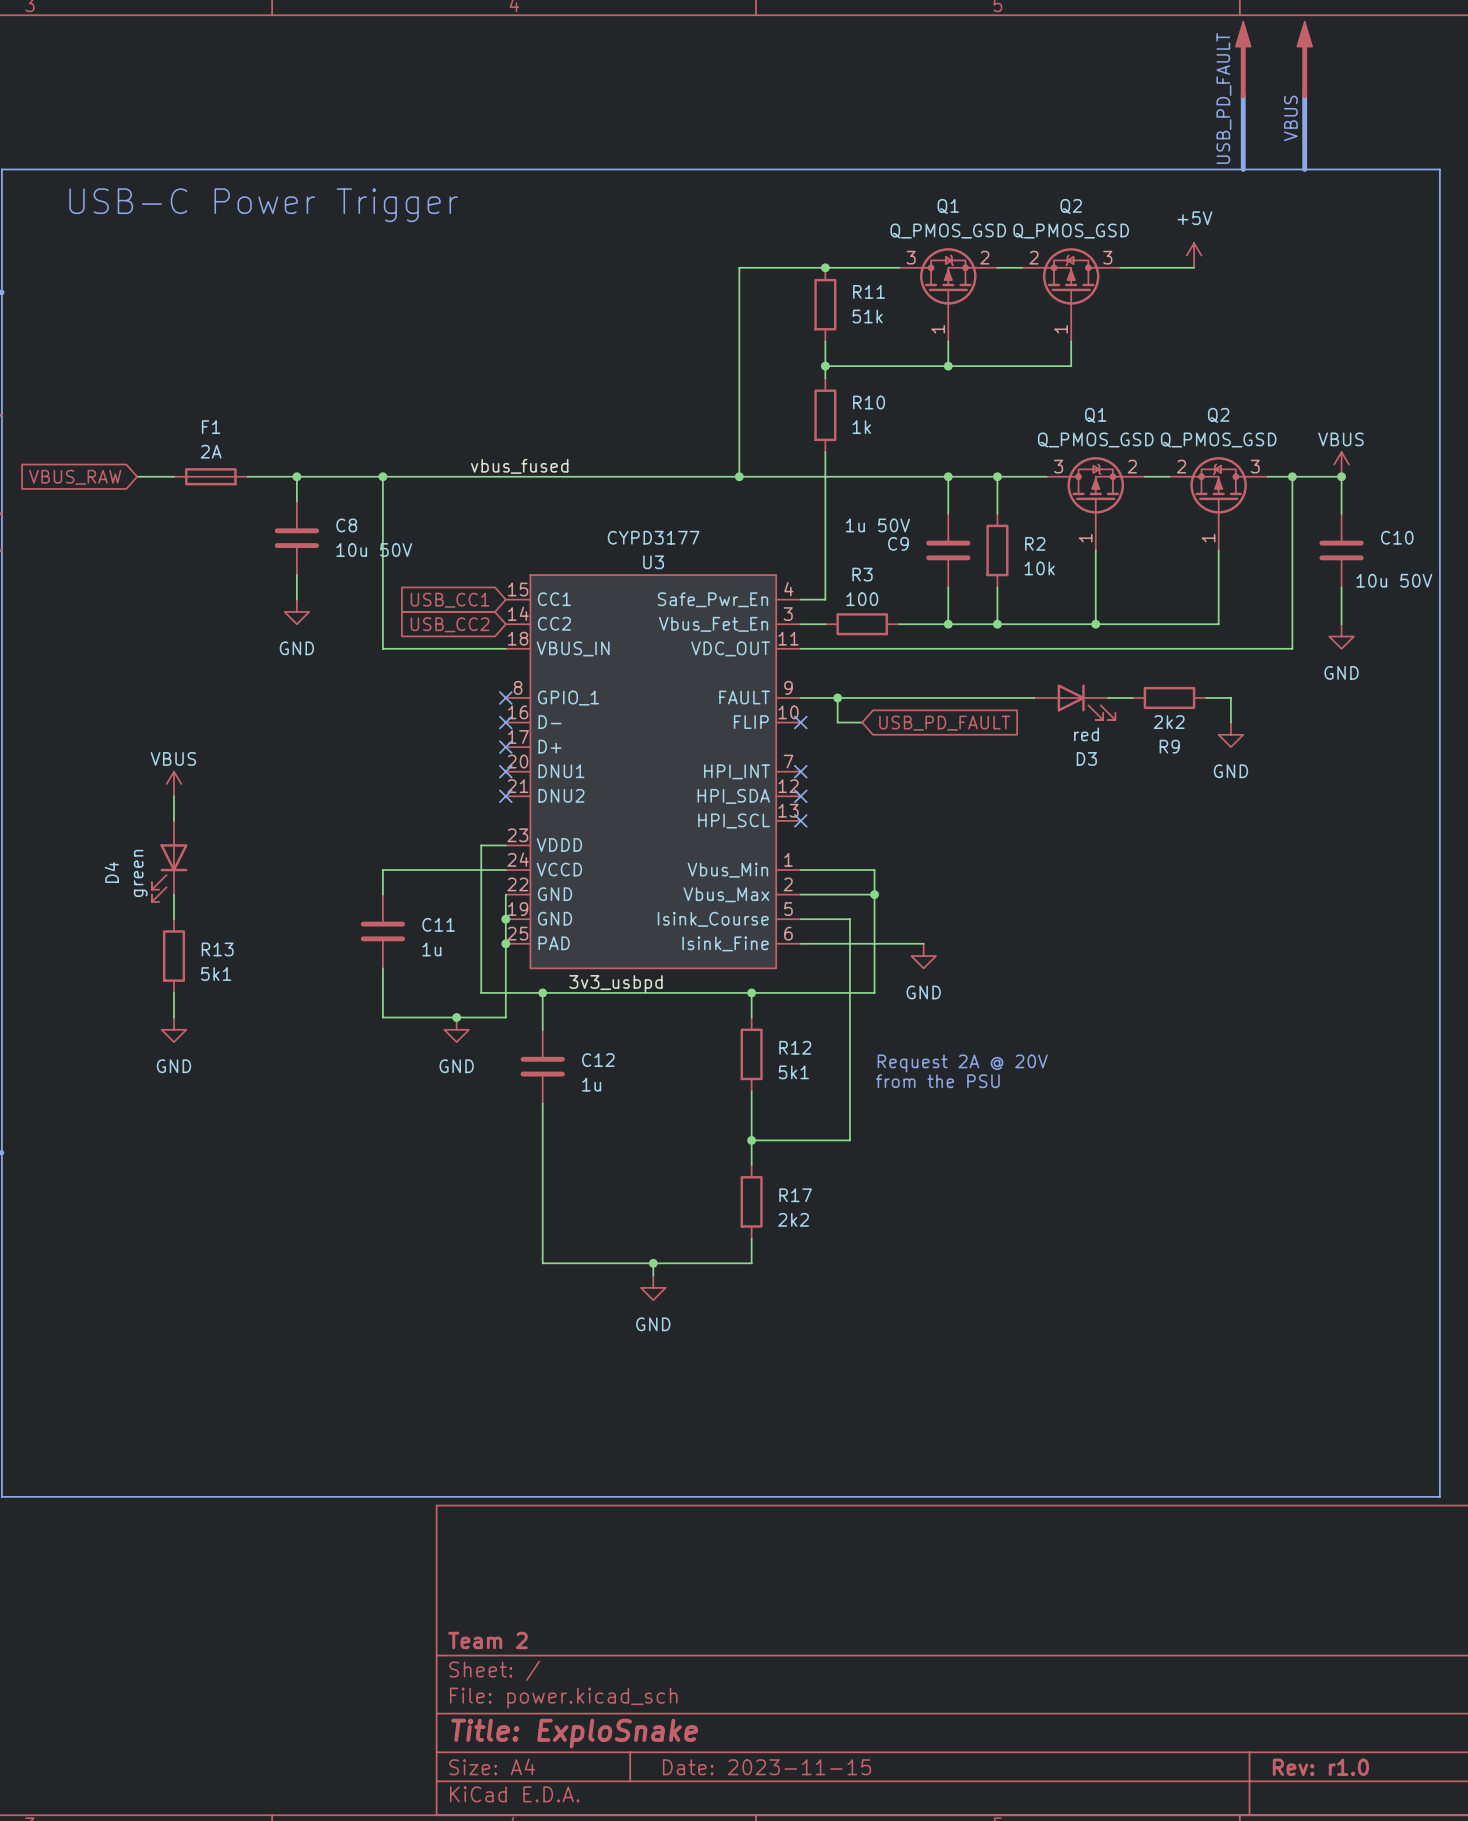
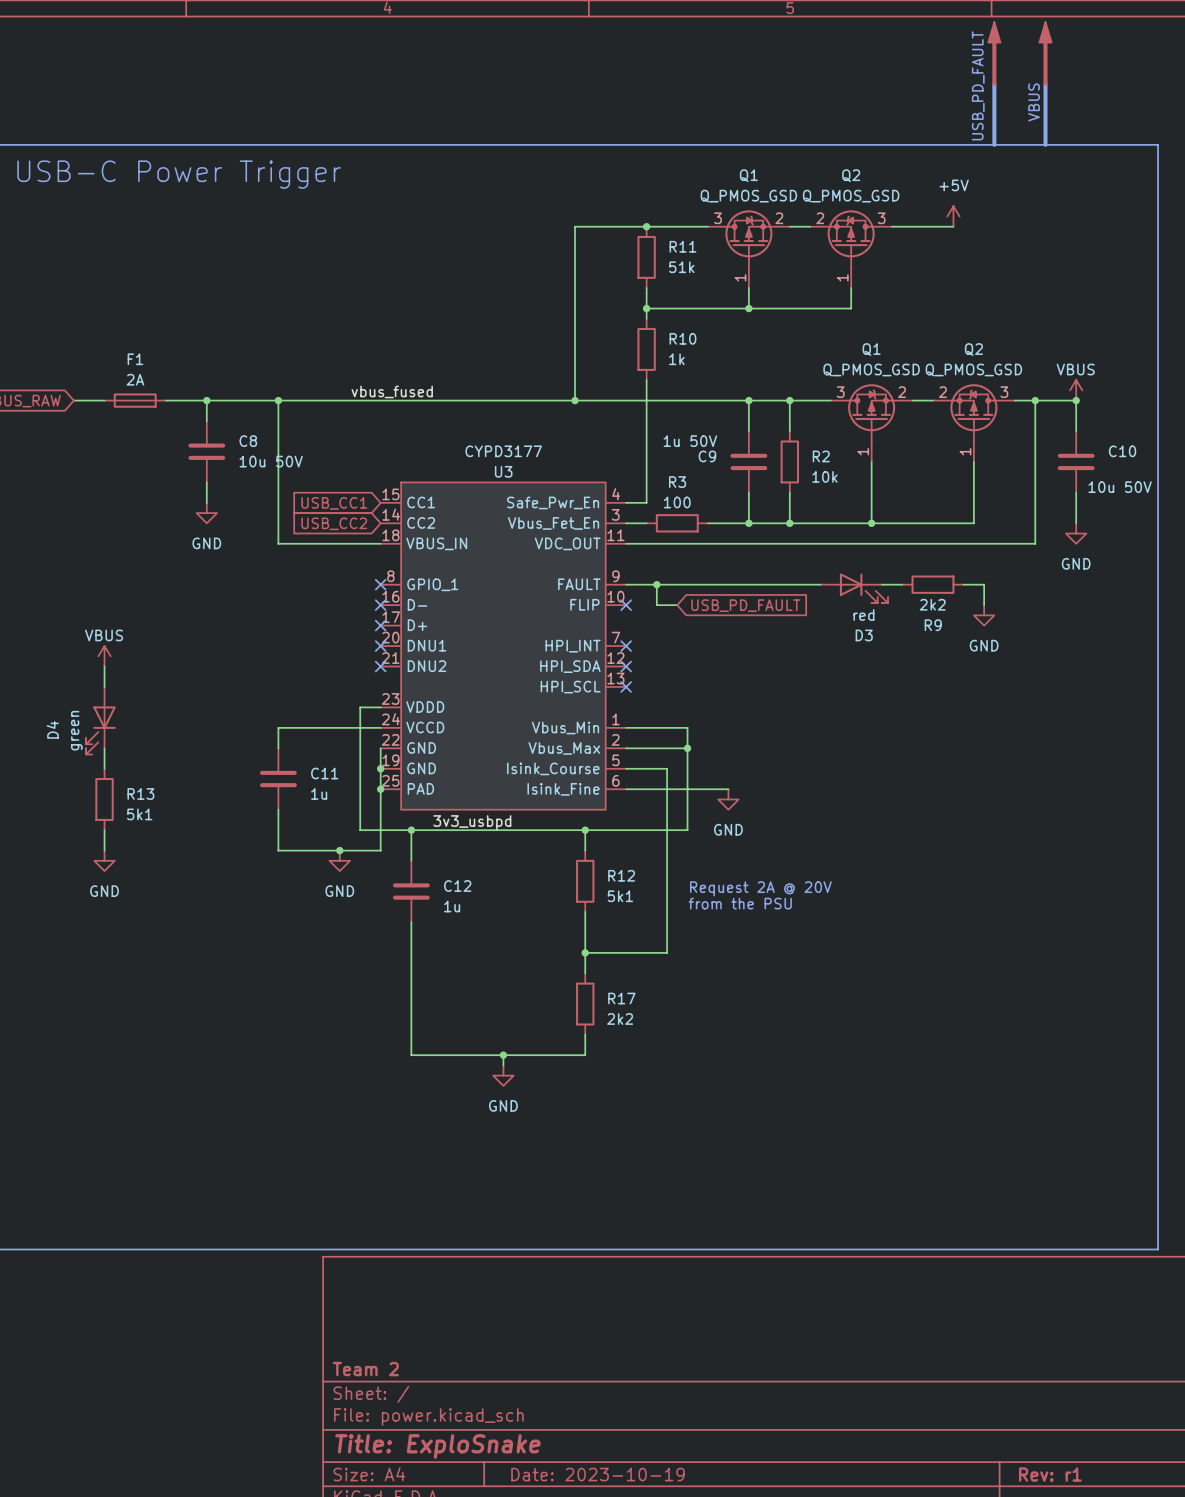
title block: Date: 2023-11-15 (766, 1767) -> Date: 2023-10-19 (598, 1474)
title block: Rev: r1.0 (1320, 1767) -> Rev: r1 (1050, 1474)

